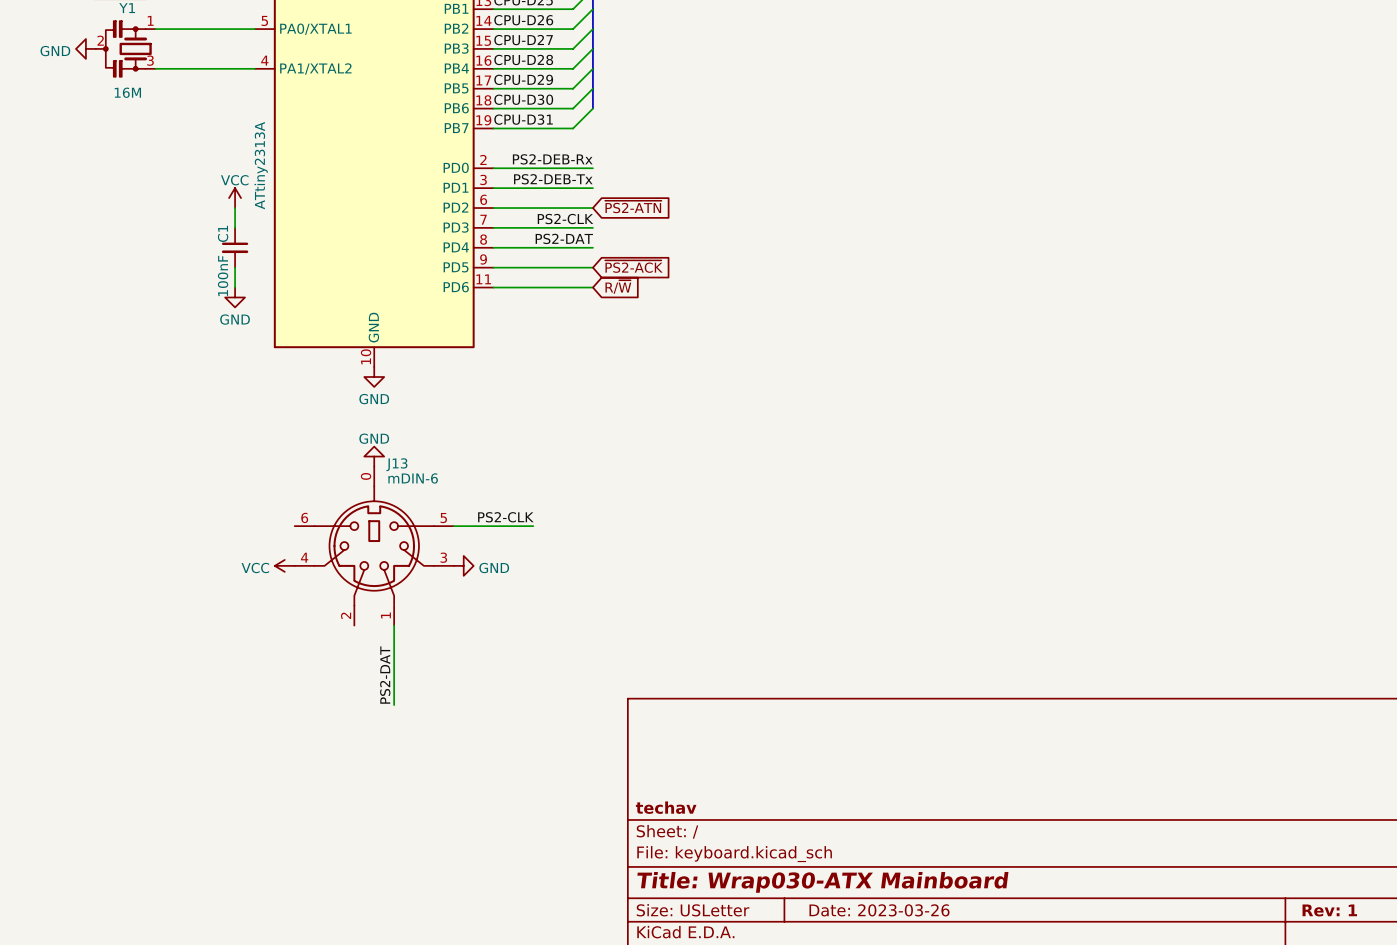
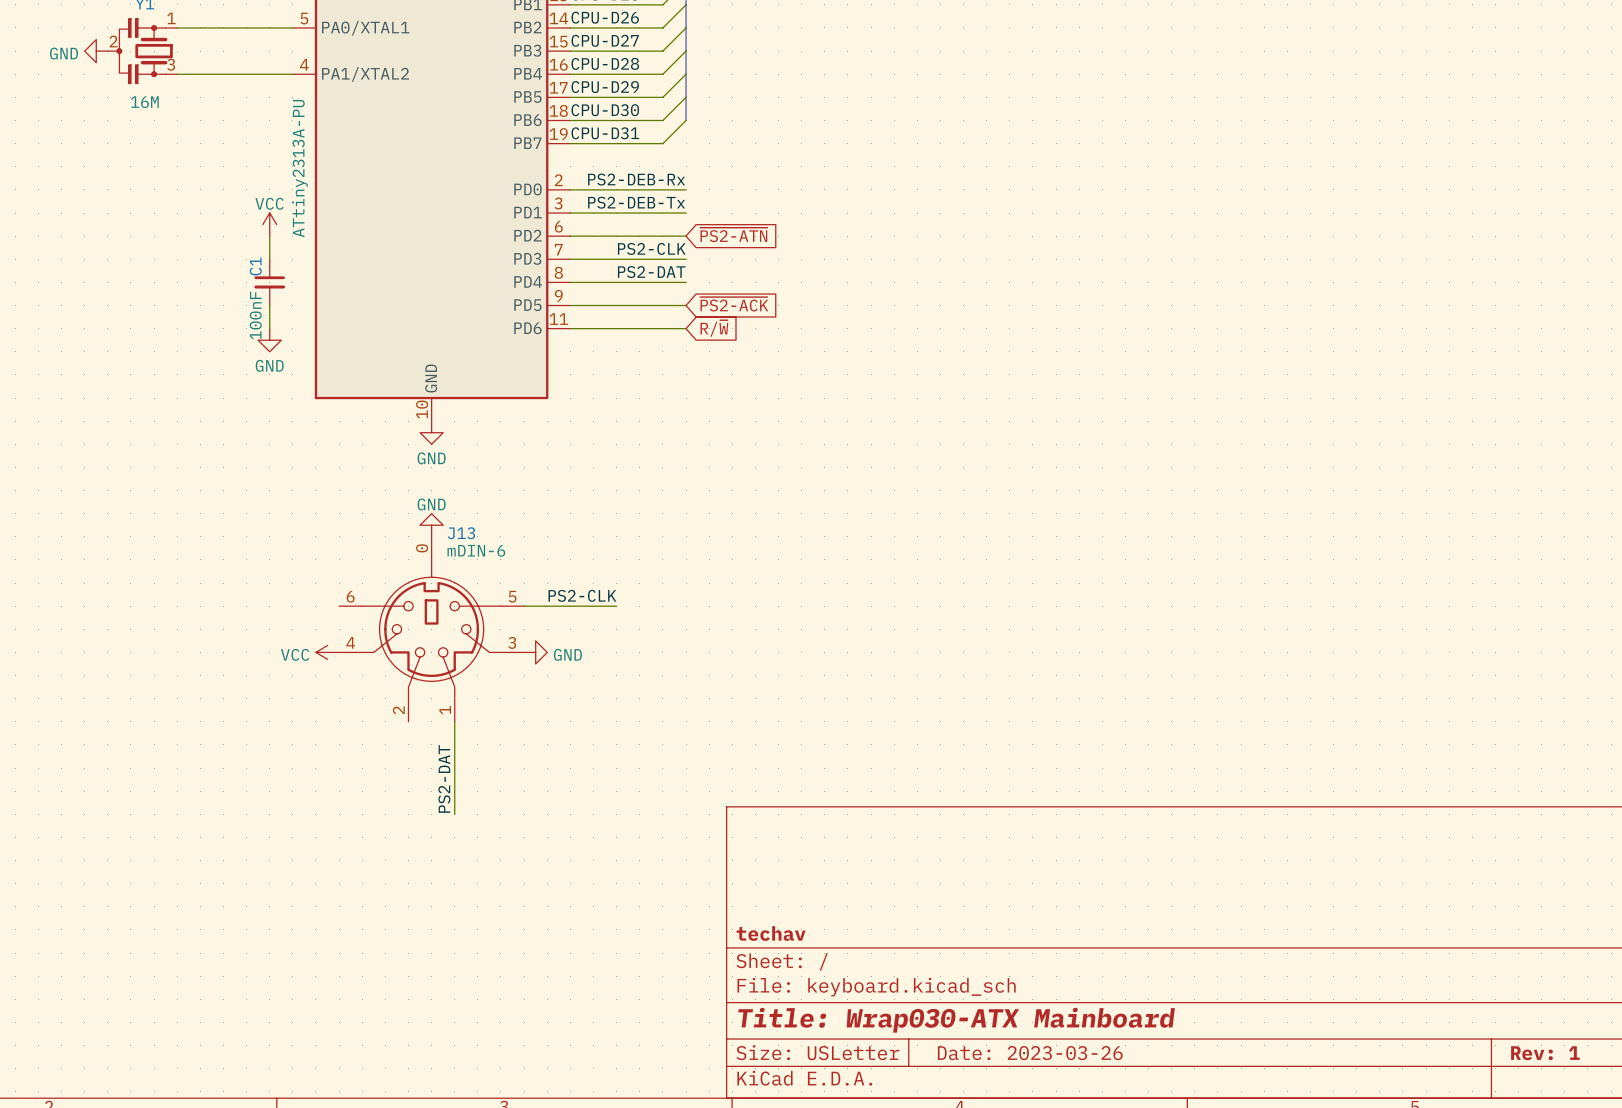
part value: ATtiny2313A (261, 165) -> ATtiny2313A-PU (299, 168)

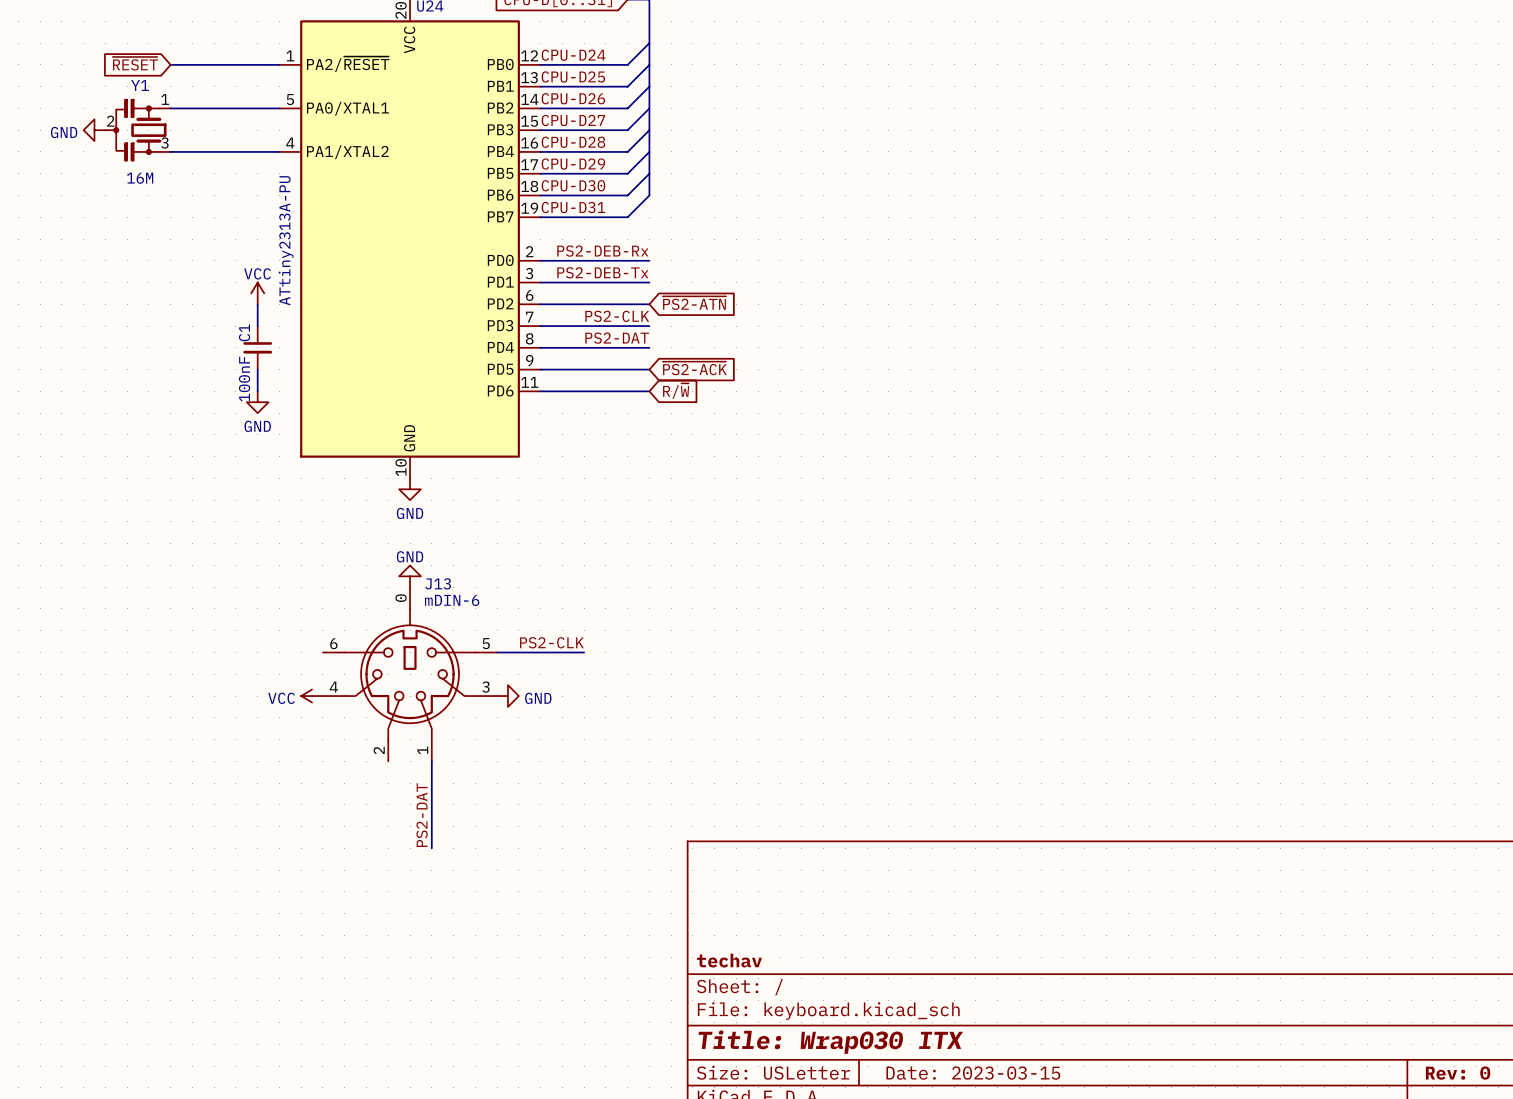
title block: Title: Wrap030-ATX Mainboard (956, 1020) -> Title: Wrap030 ITX (830, 1042)
title block: Date: 2023-03-26 (1030, 1053) -> Date: 2023-03-15 (973, 1073)
title block: Rev: 1 (1545, 1053) -> Rev: 0 (1458, 1073)

